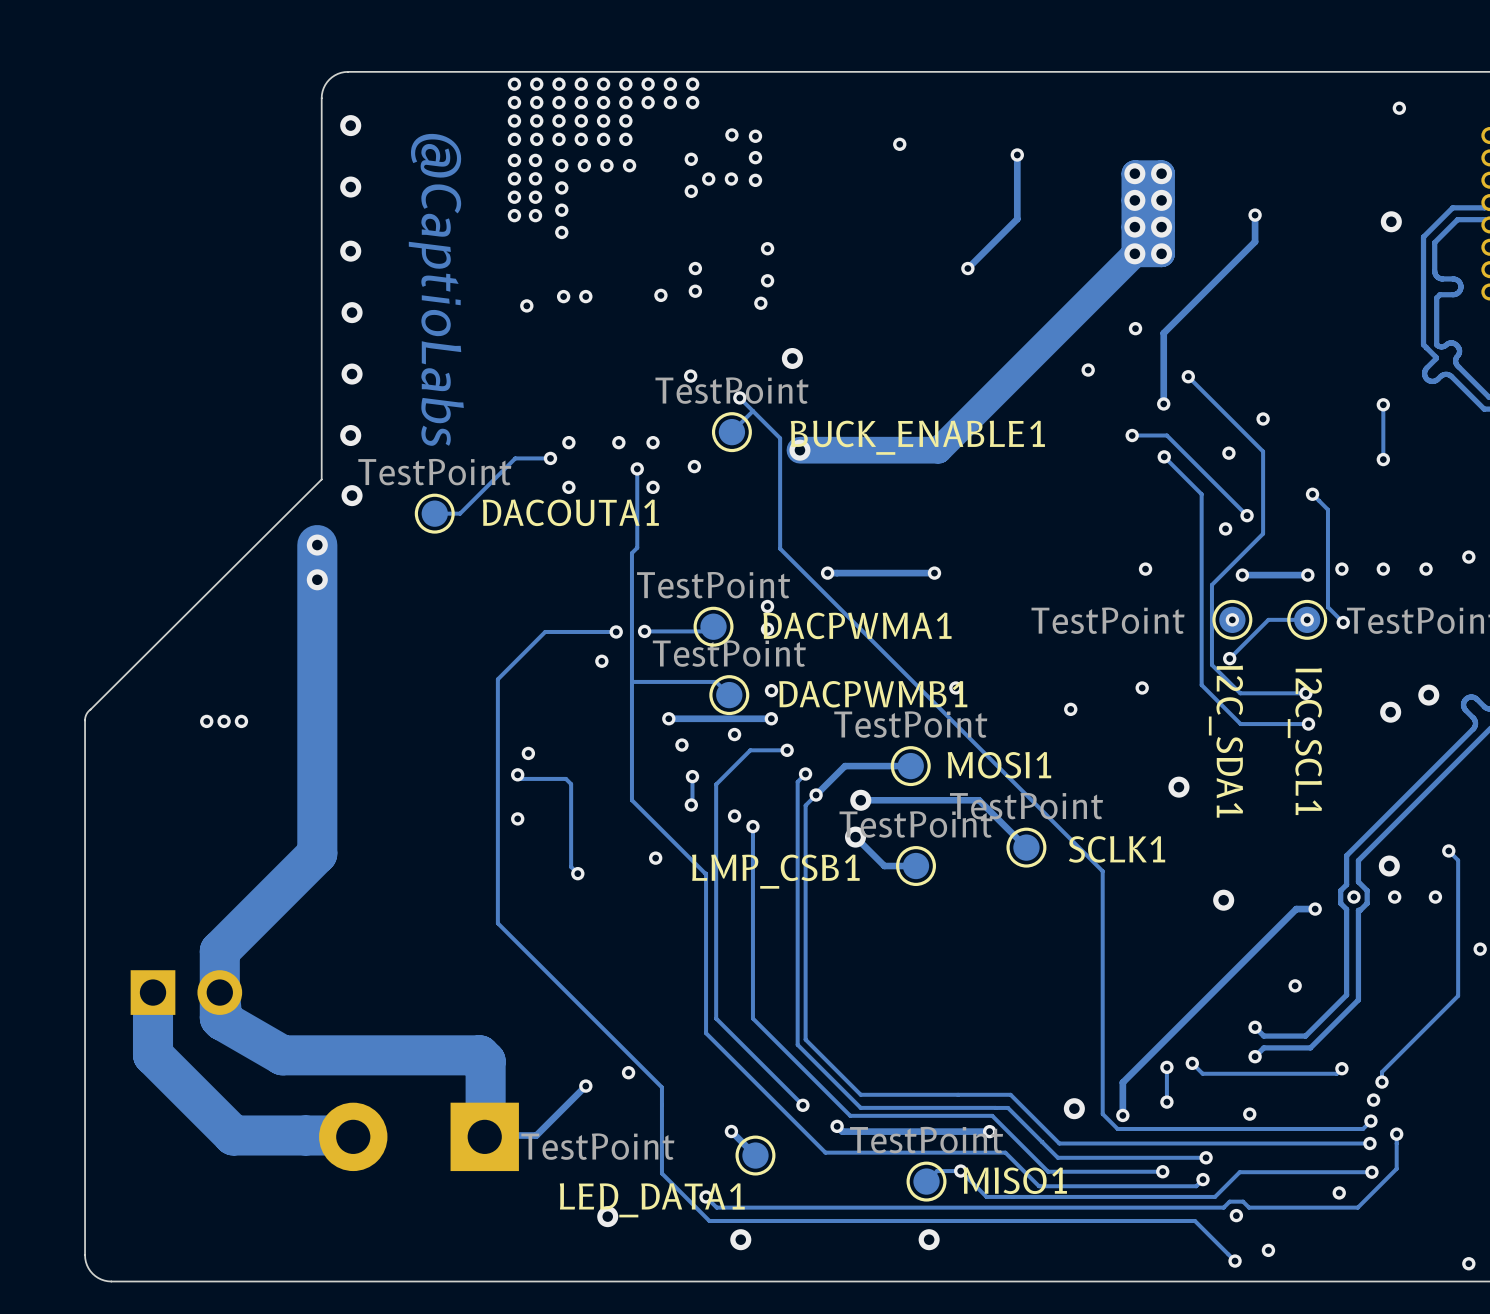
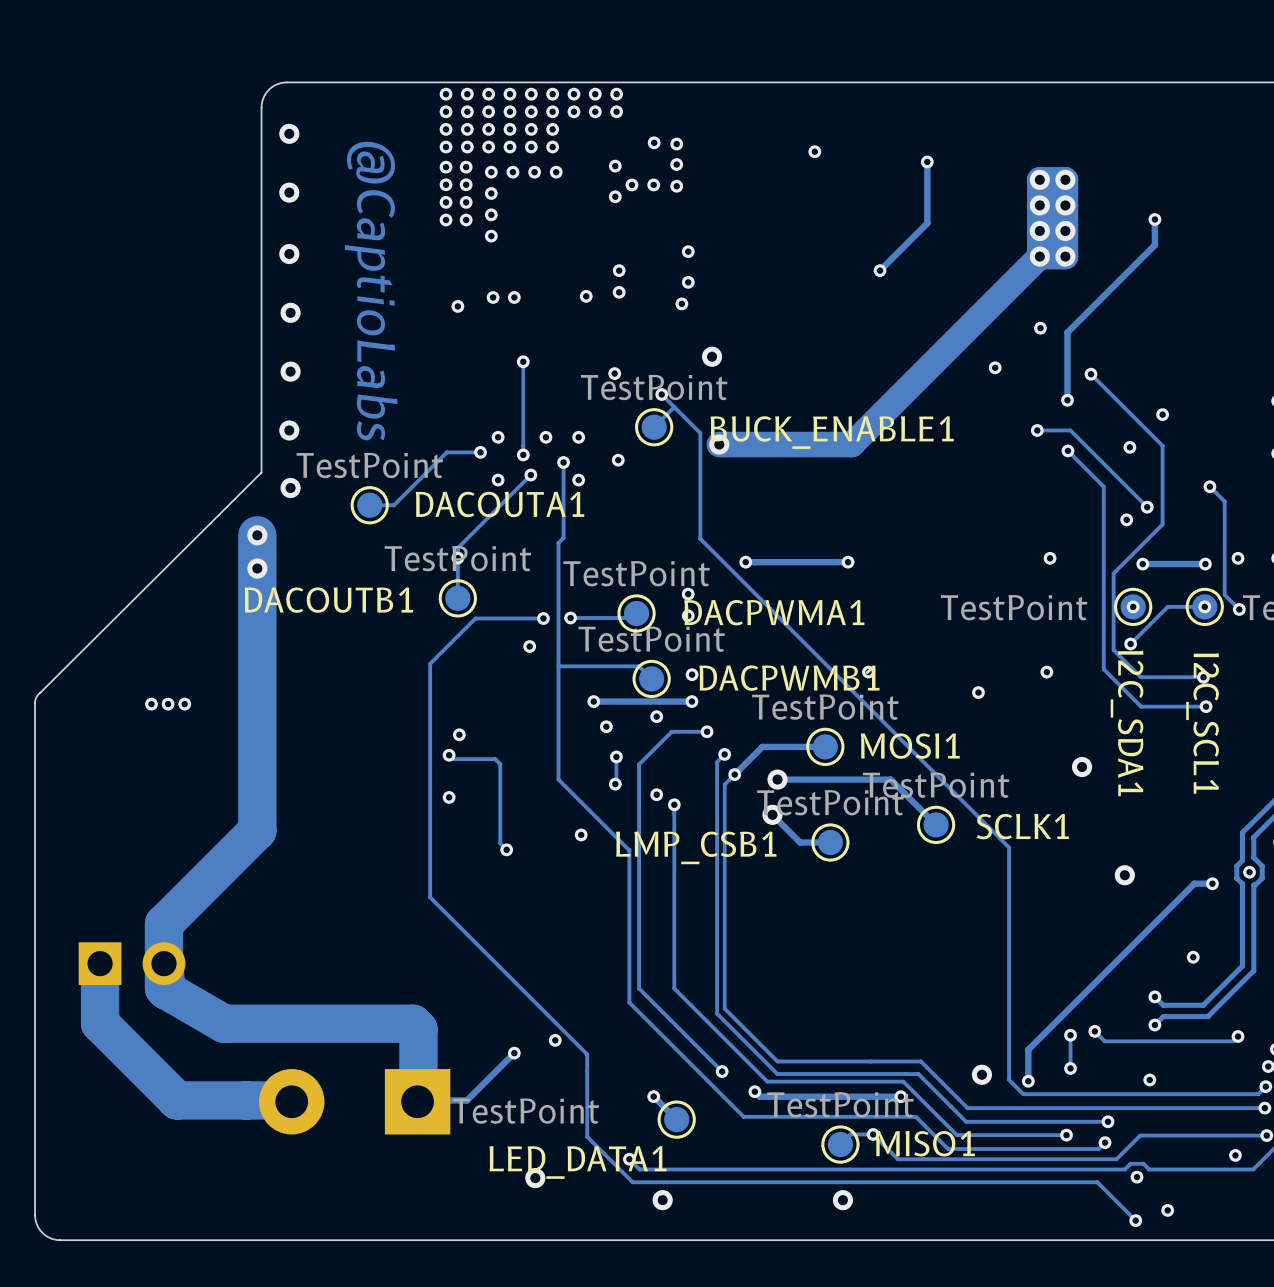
track: none -> (523, 361) (523, 454)
via: none -> (523, 361)
via: none -> (523, 454)
track: none -> (530, 475) (457, 548) (457, 598)
via: none -> (530, 475)
via: none -> (457, 558)
DACOUTB1: none -> TestPoint (457, 598)

